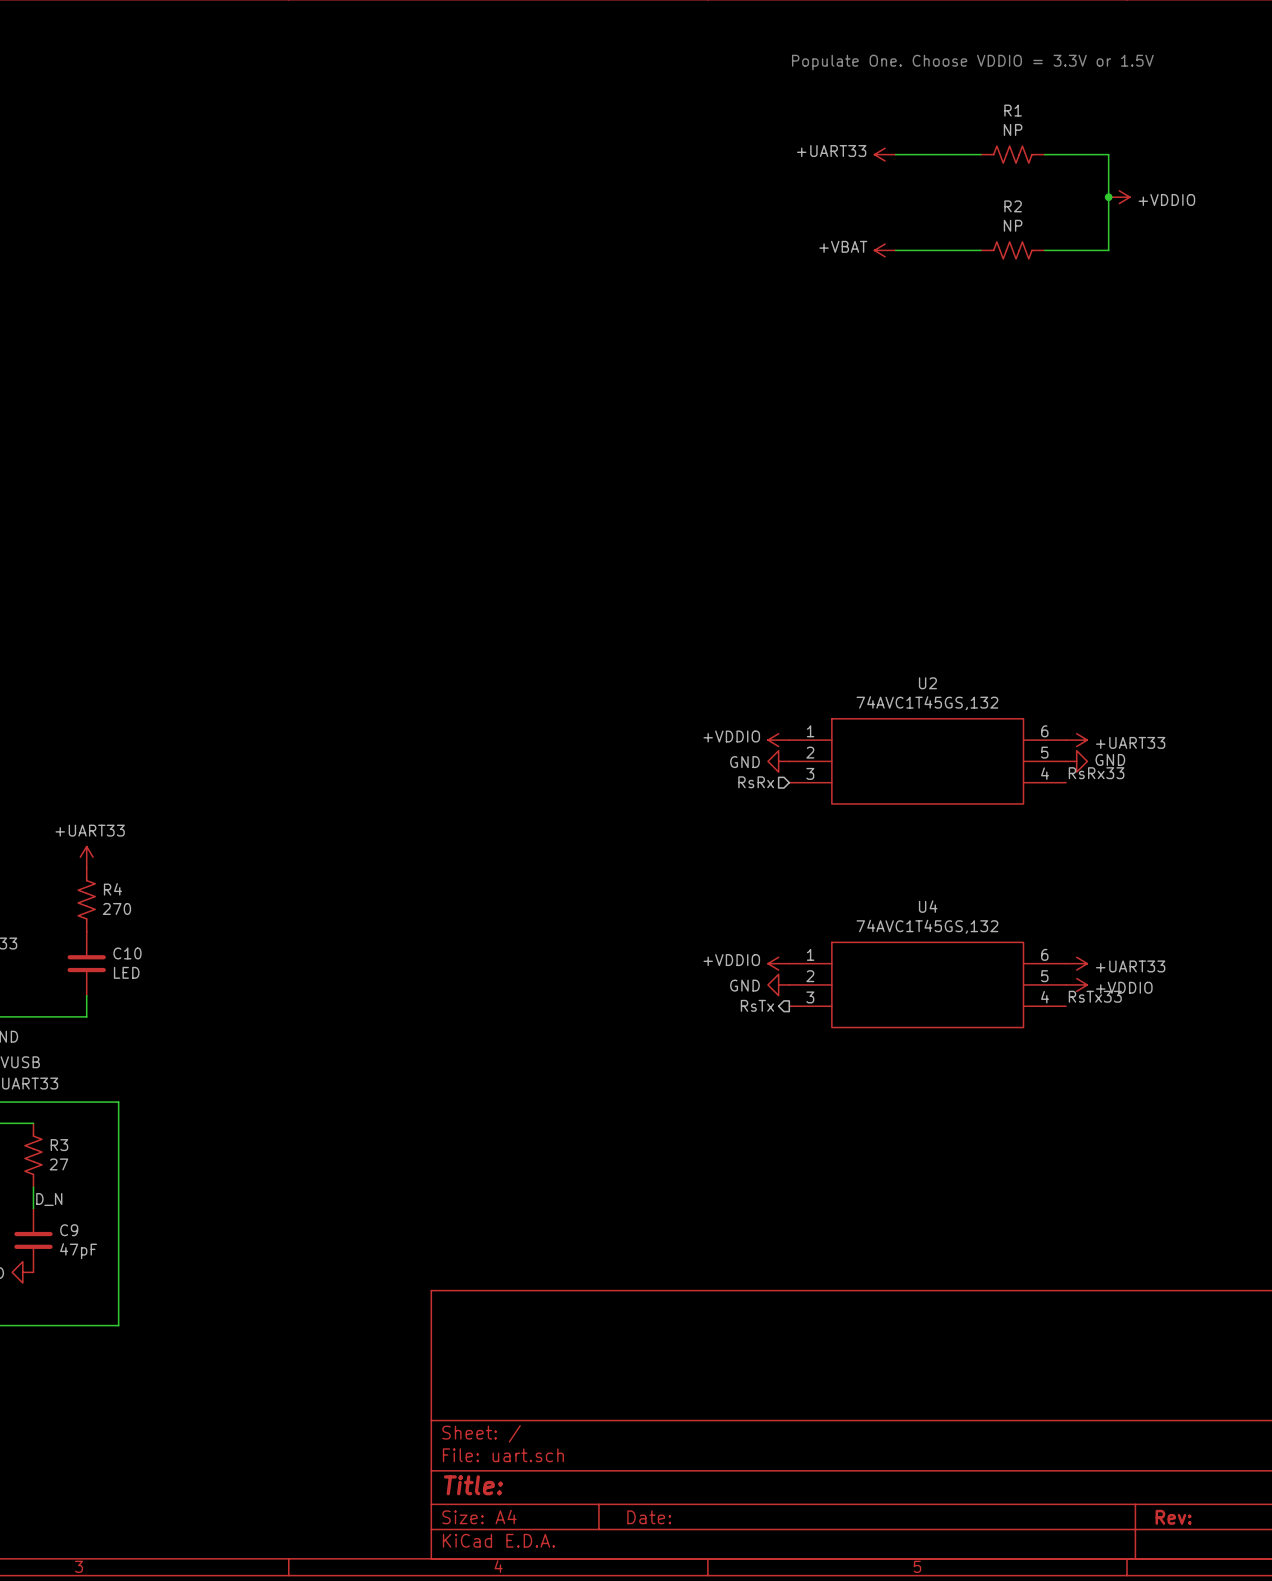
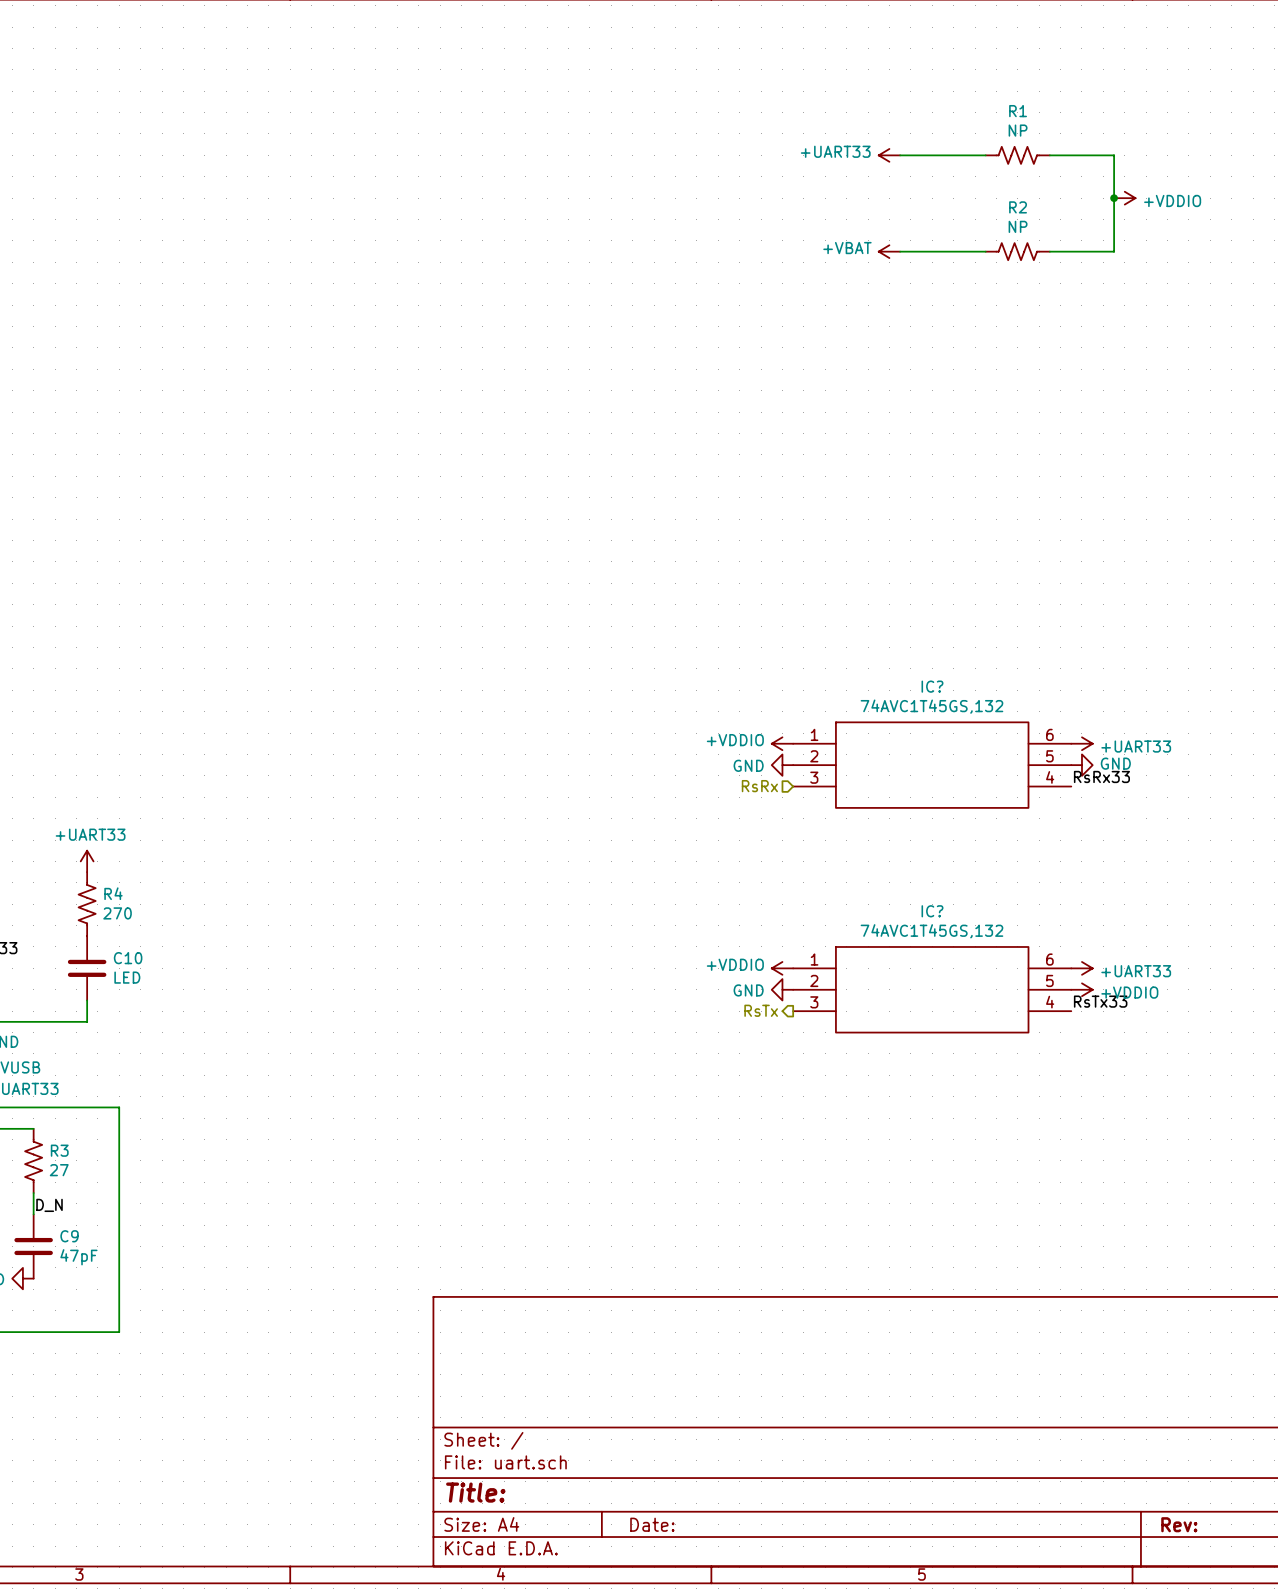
text: Populate One. Choose VDDIO = 3.3V or 1.5V (972, 62) -> none
U2 name: U2 (927, 683) -> IC? (932, 686)
U4 name: U4 (928, 906) -> IC? (932, 911)

